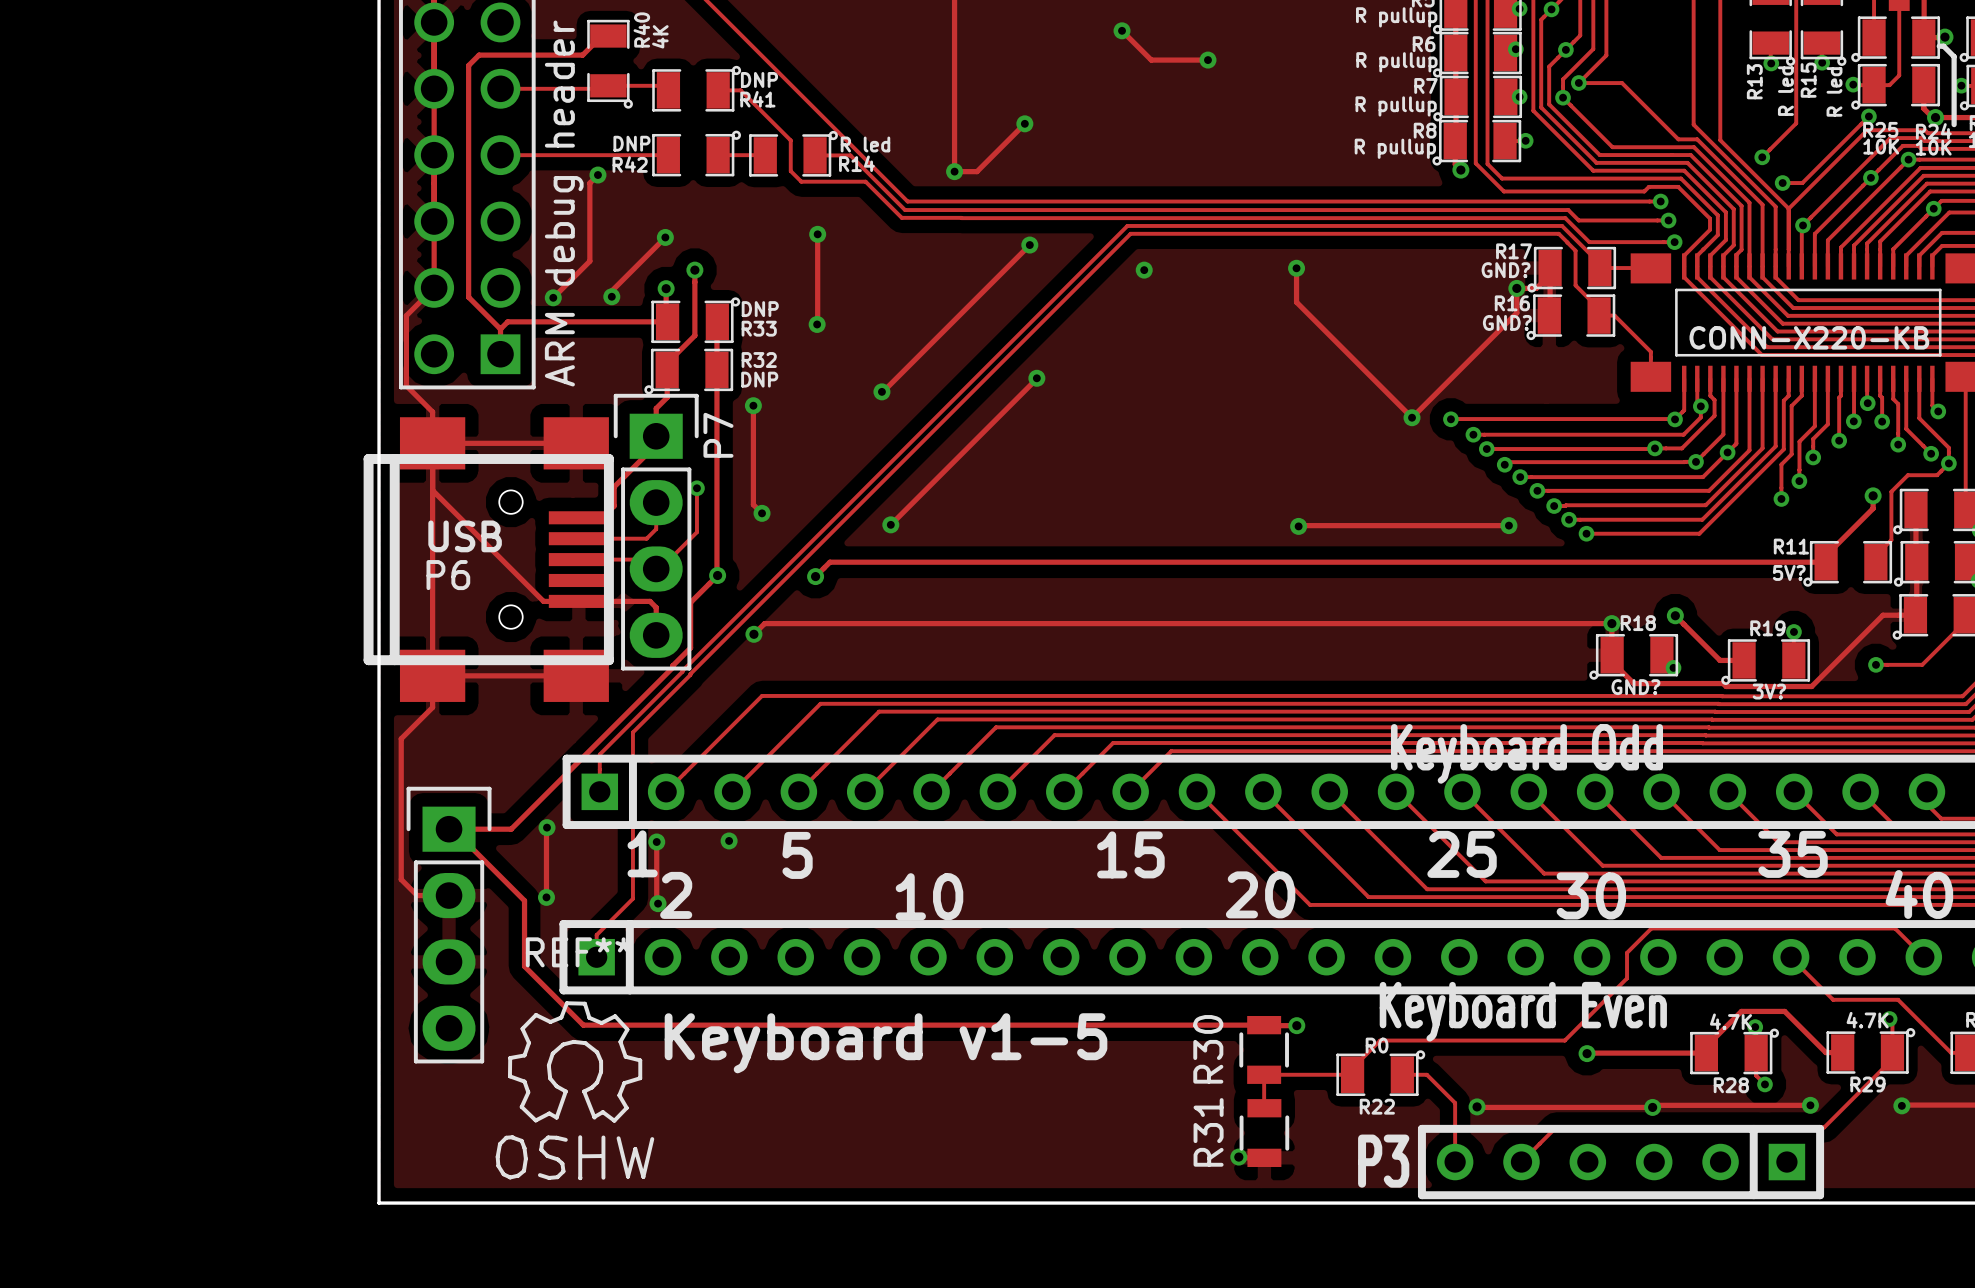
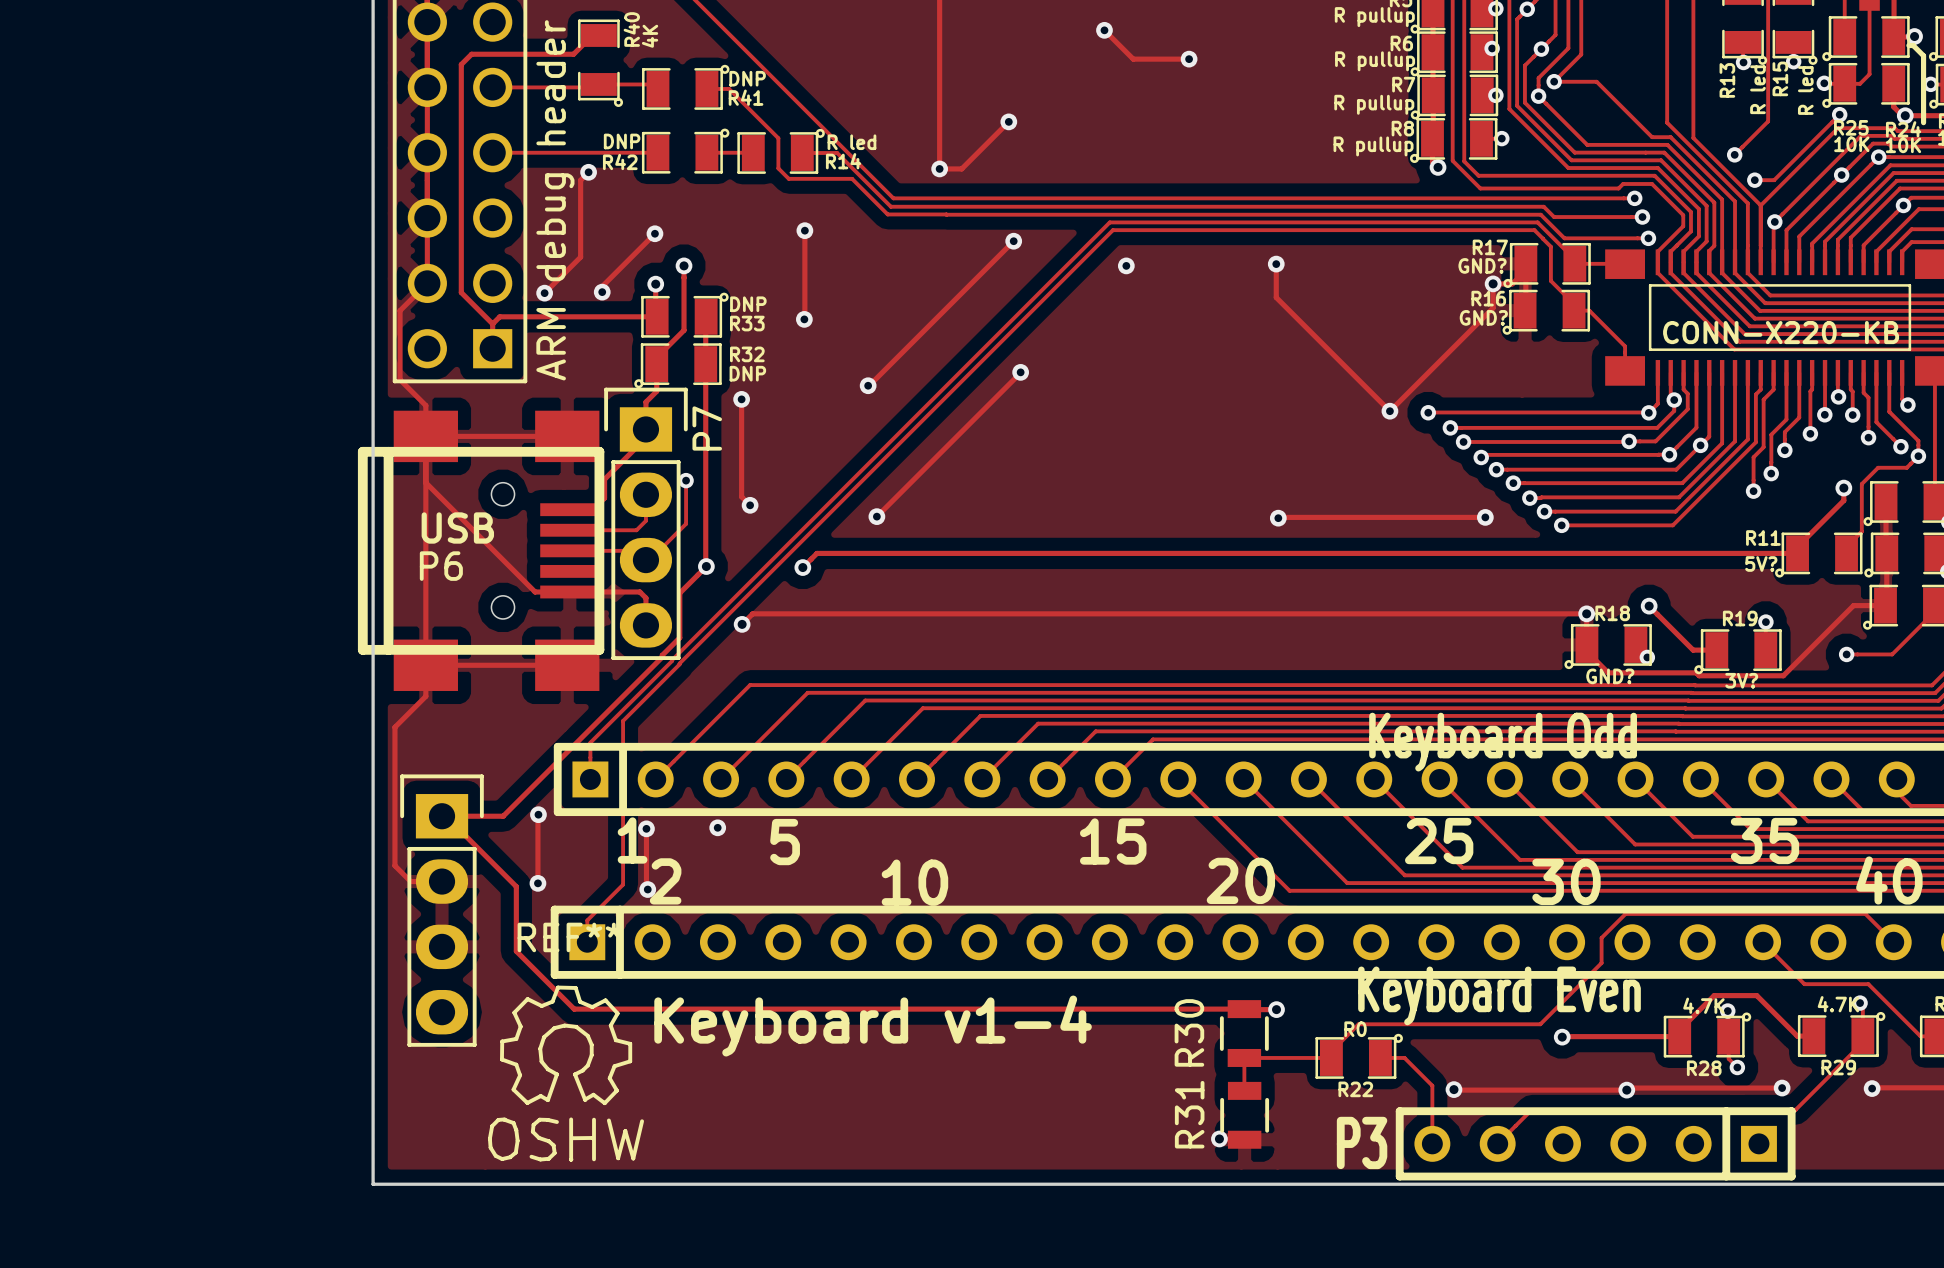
text: Keyboard v1-5 (886, 1043) -> Keyboard v1-4 (873, 1026)

